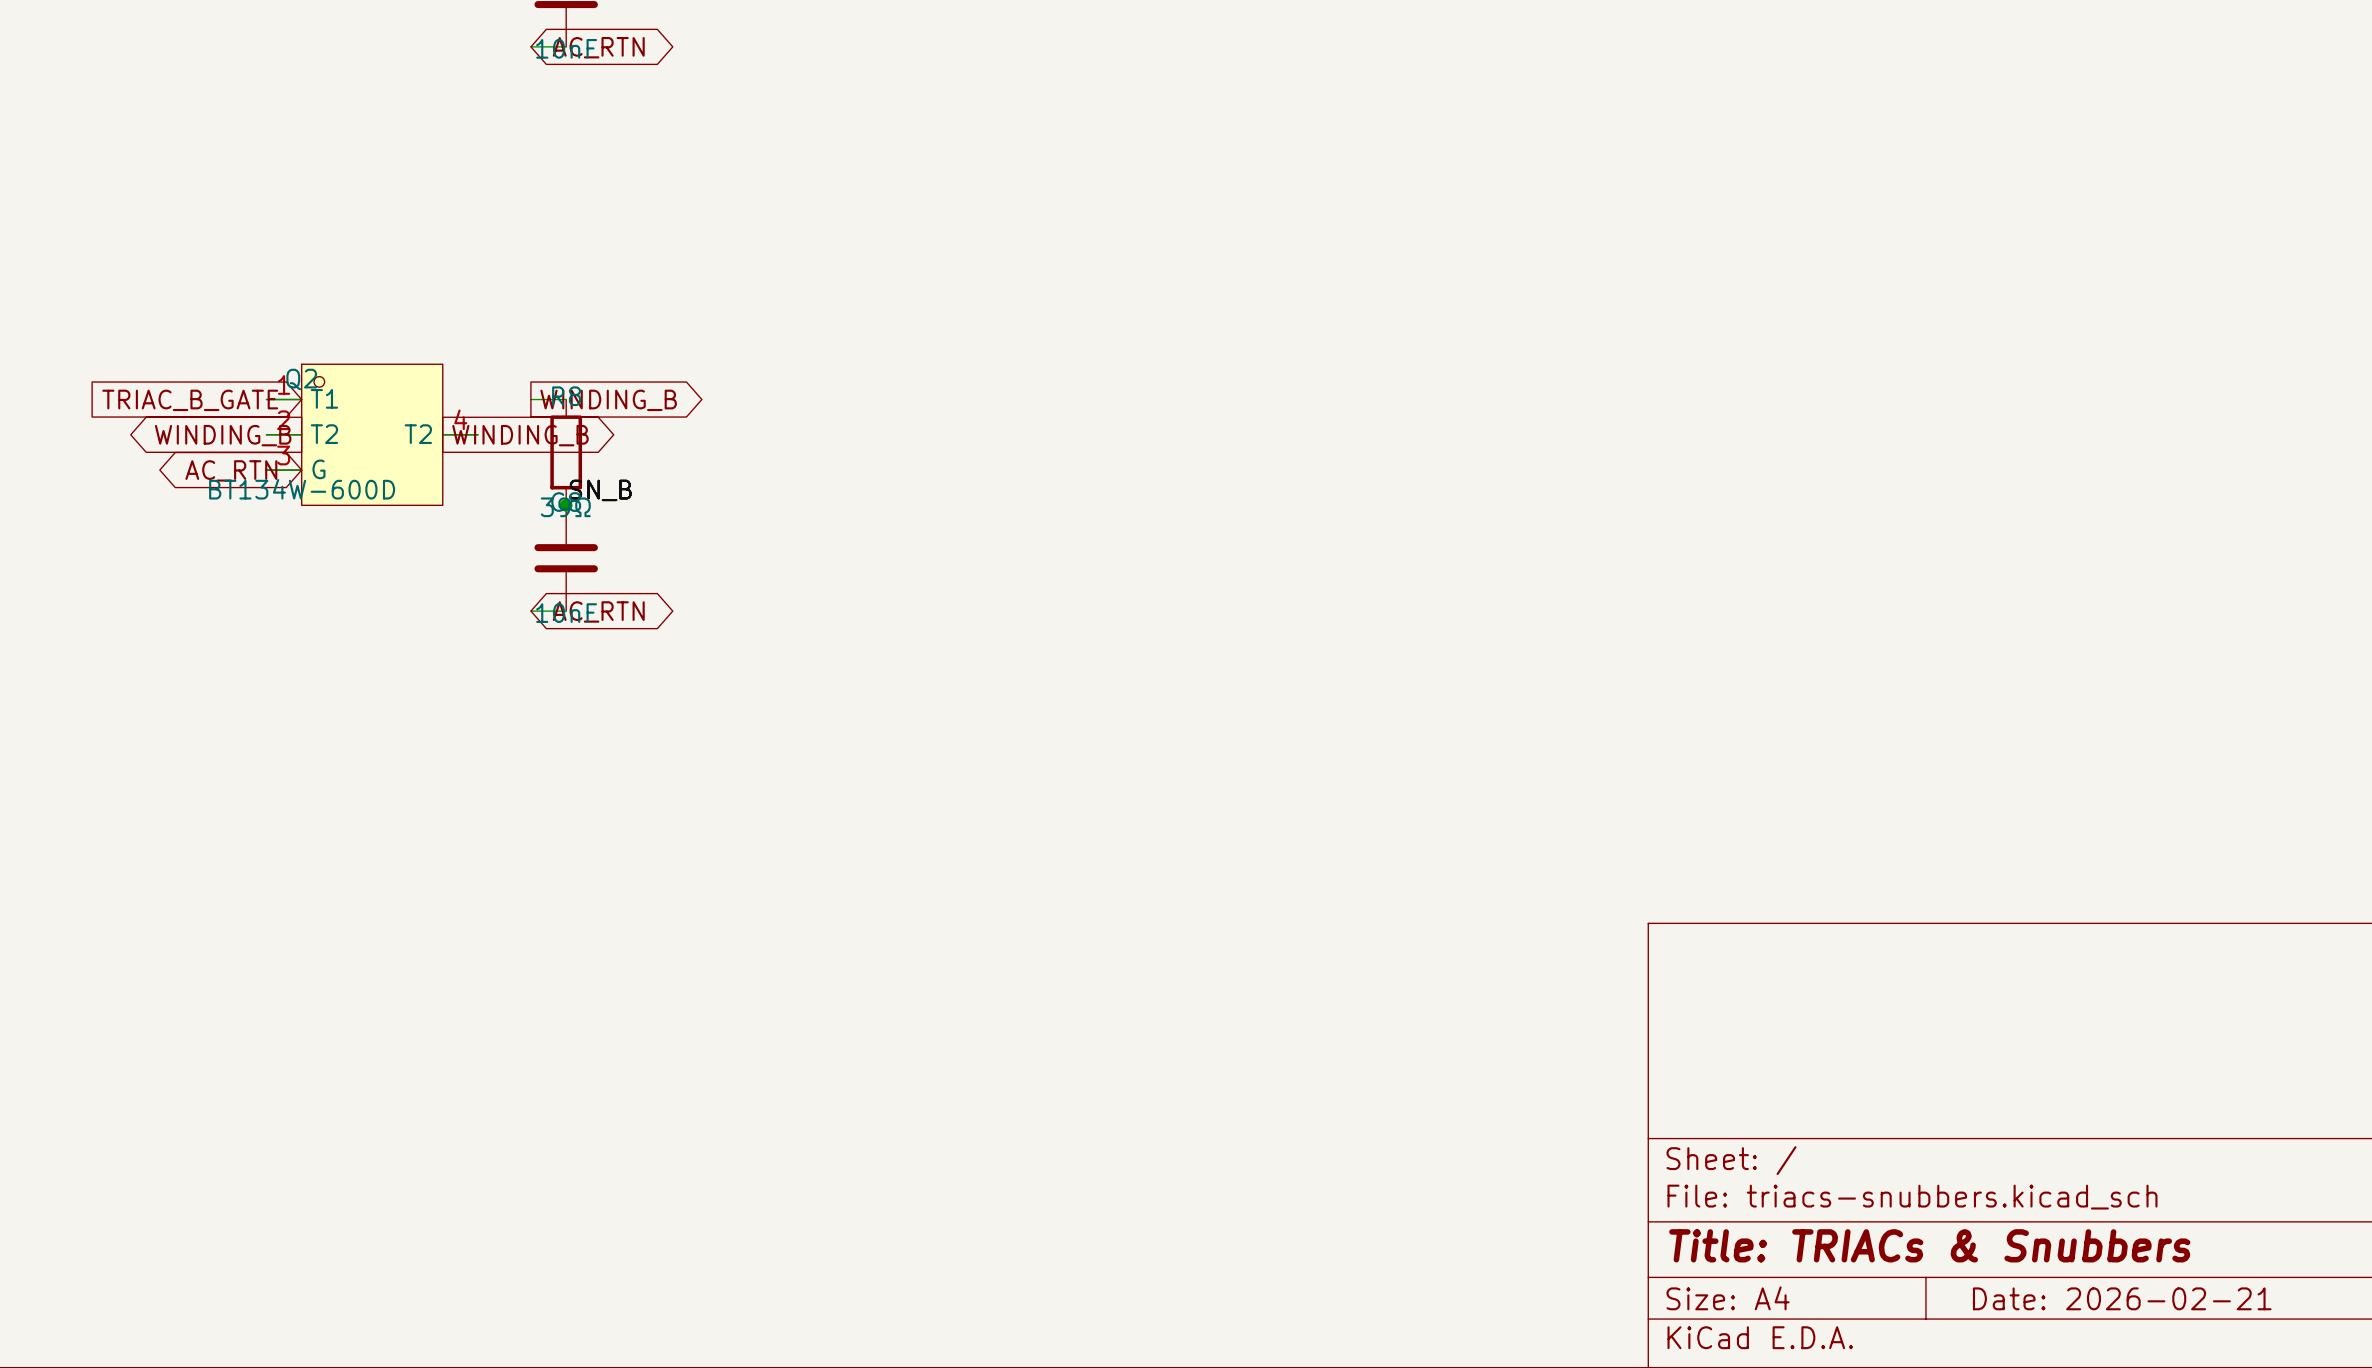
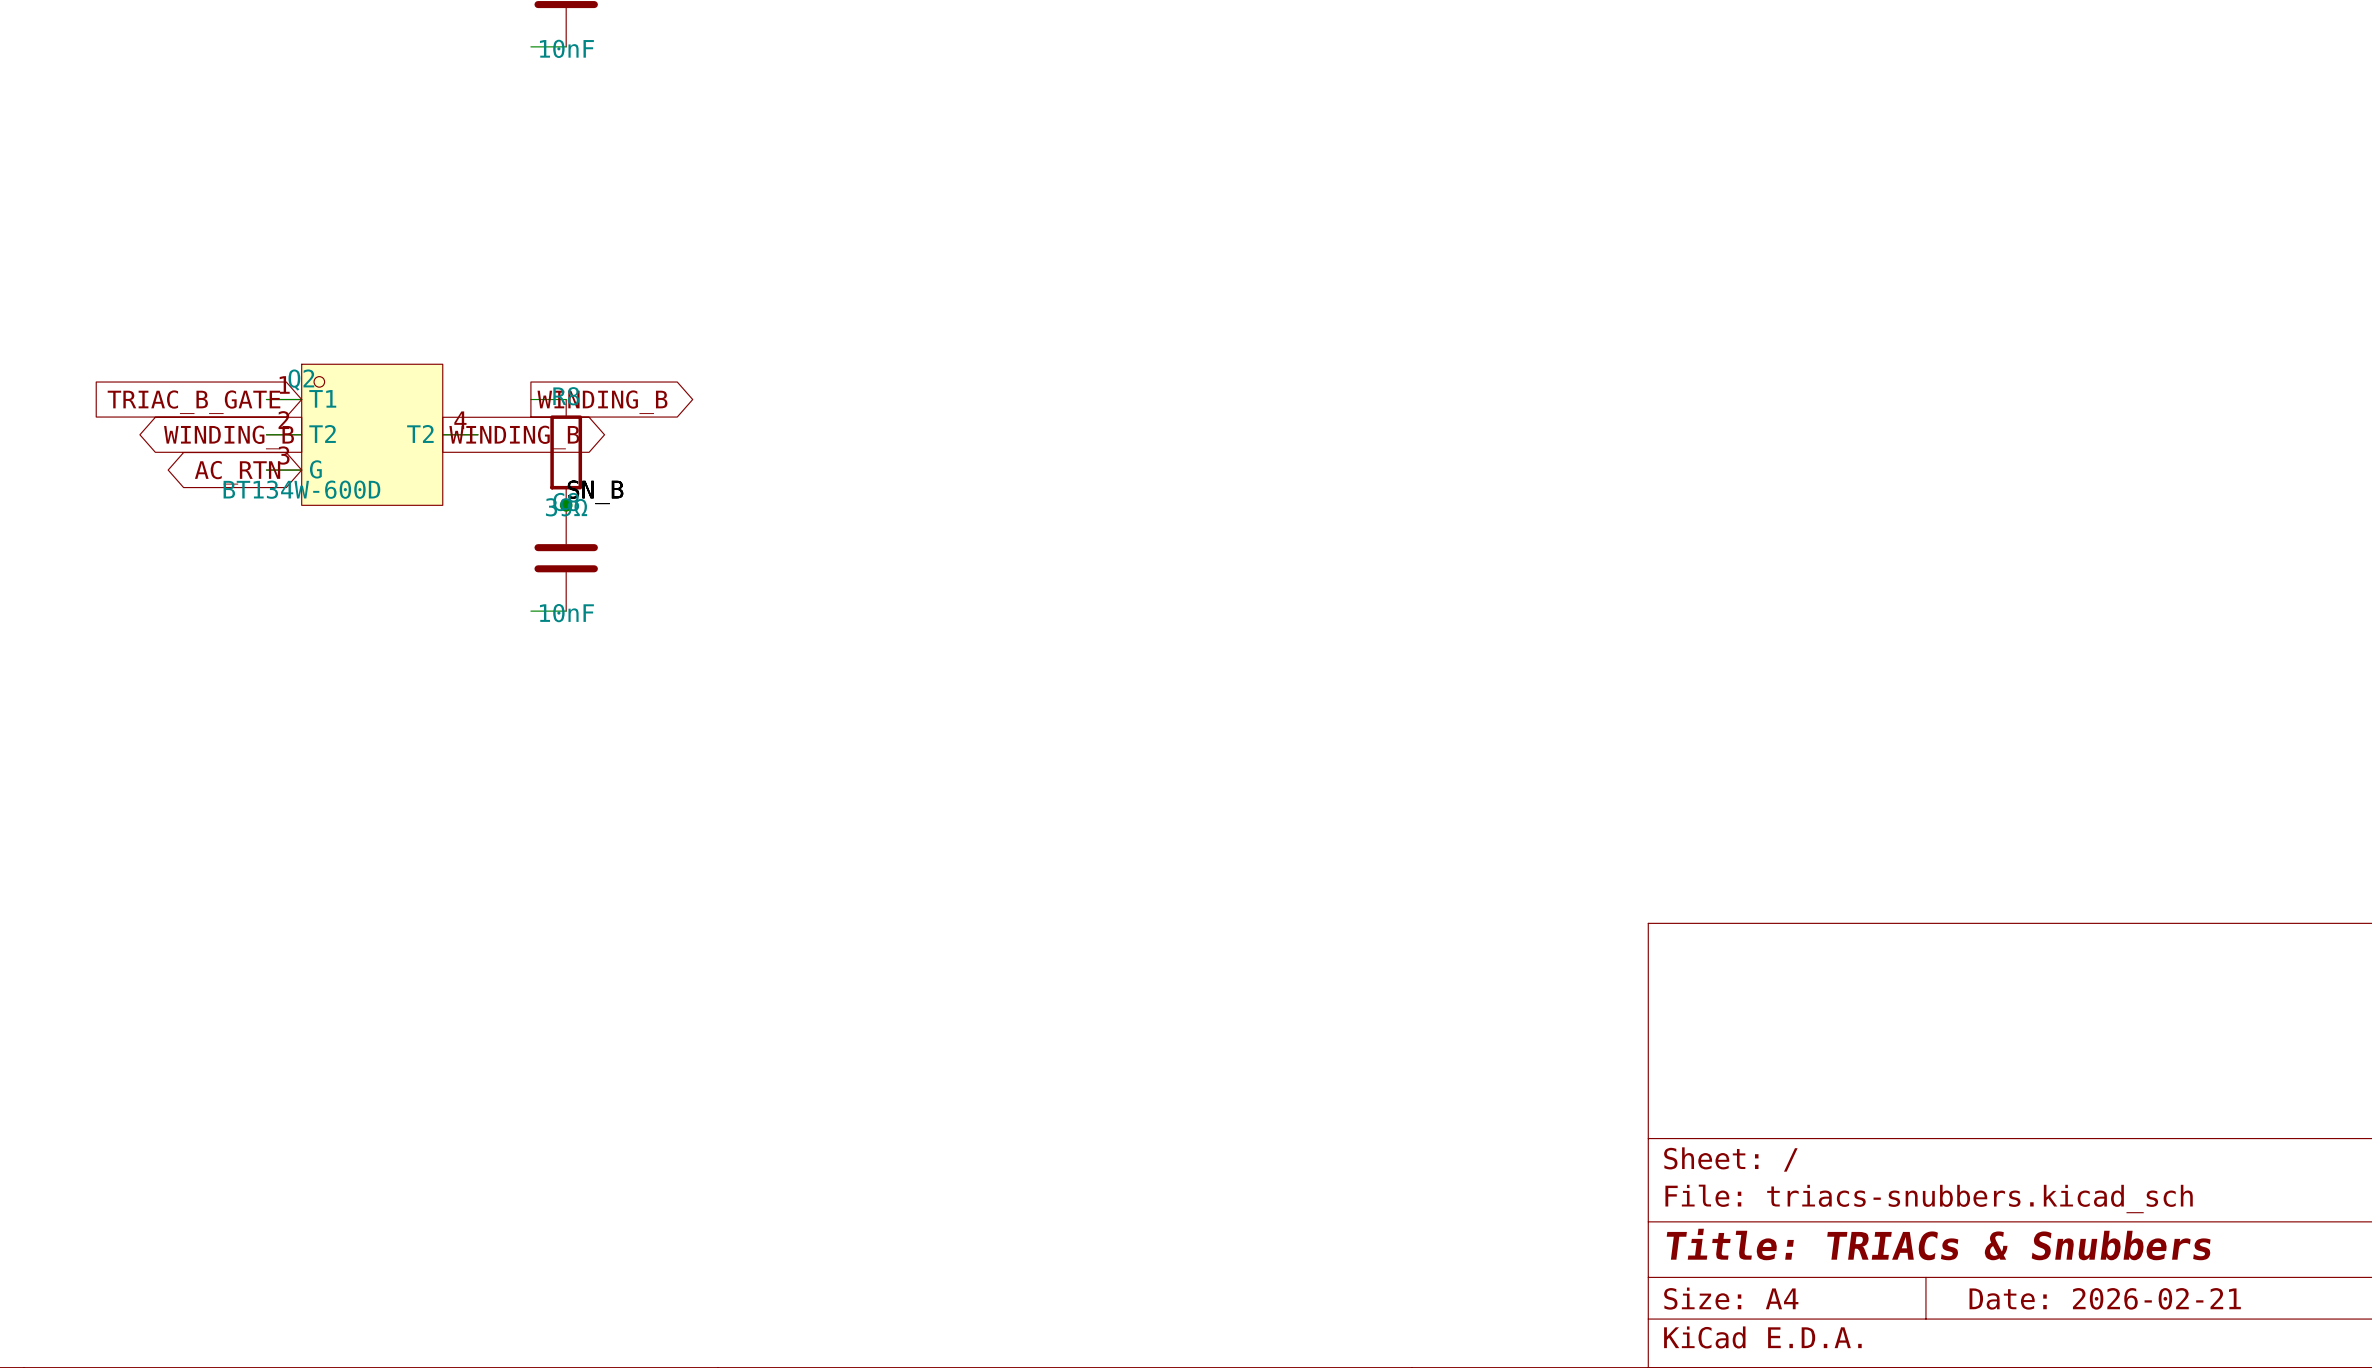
global label: AC_RTN (598, 47) -> none
global label: AC_RTN (598, 611) -> none

